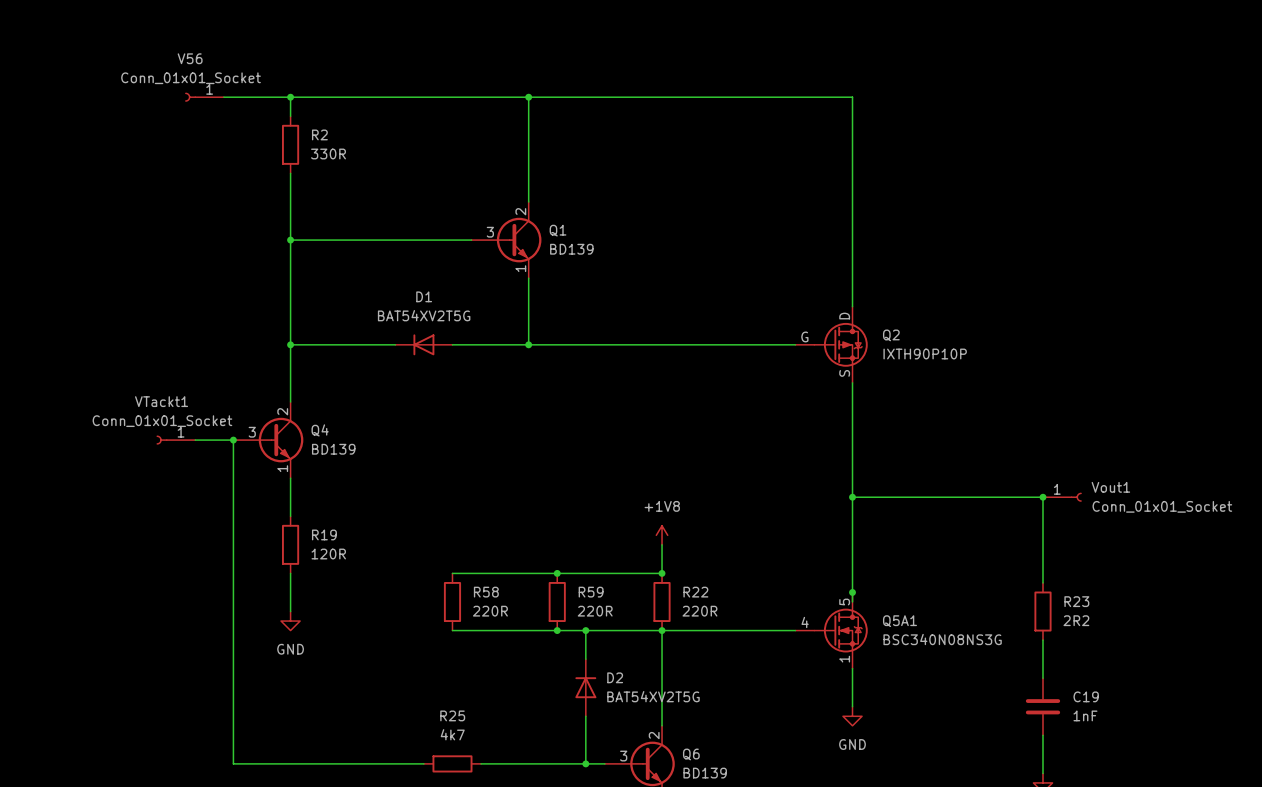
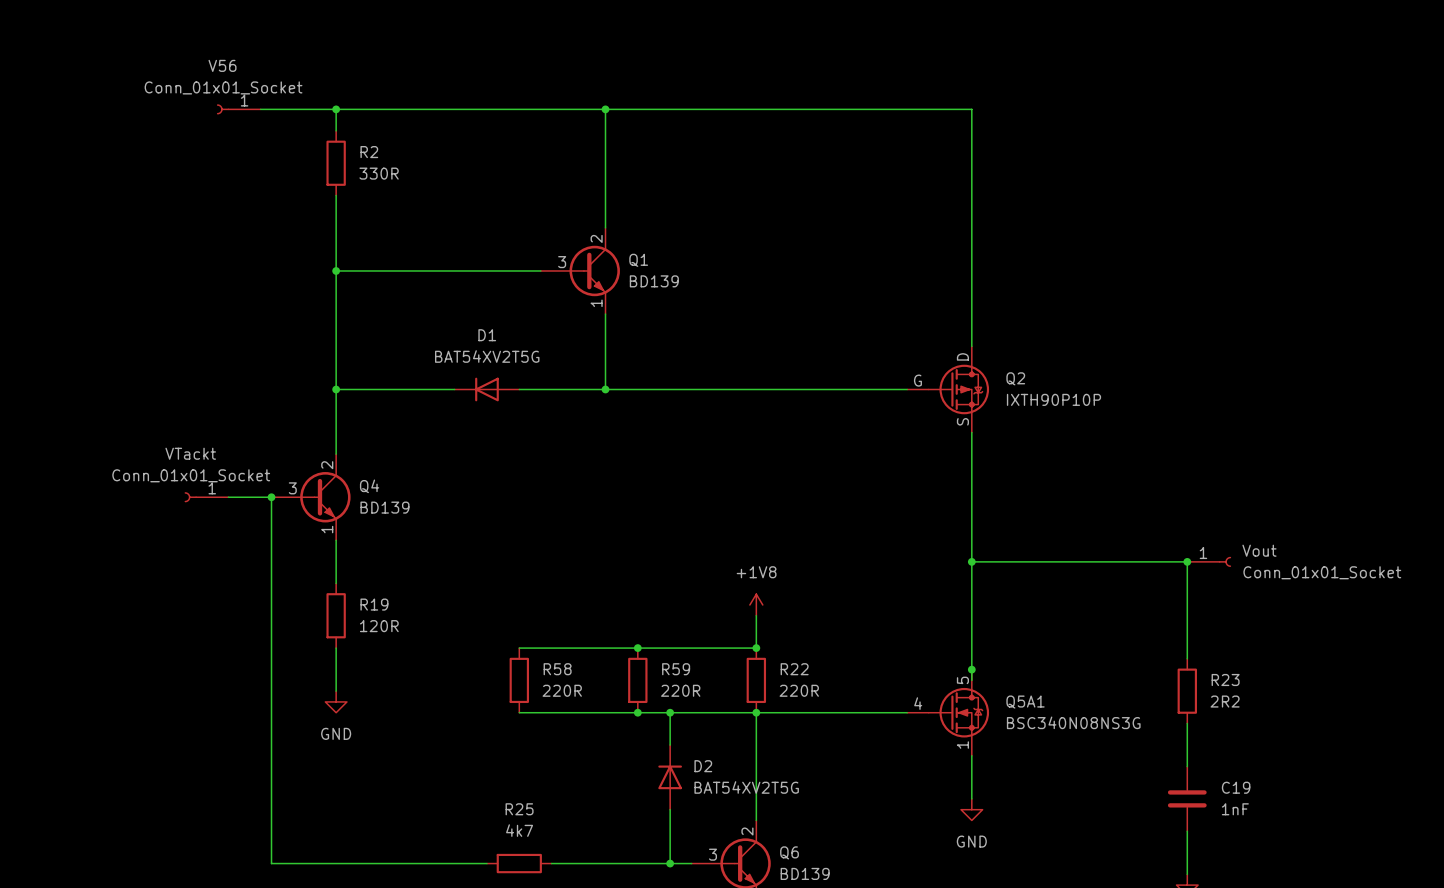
VTackt1 name: VTackt1 (161, 401) -> VTackt (190, 453)
Vout1 name: Vout1 (1110, 487) -> Vout (1259, 550)

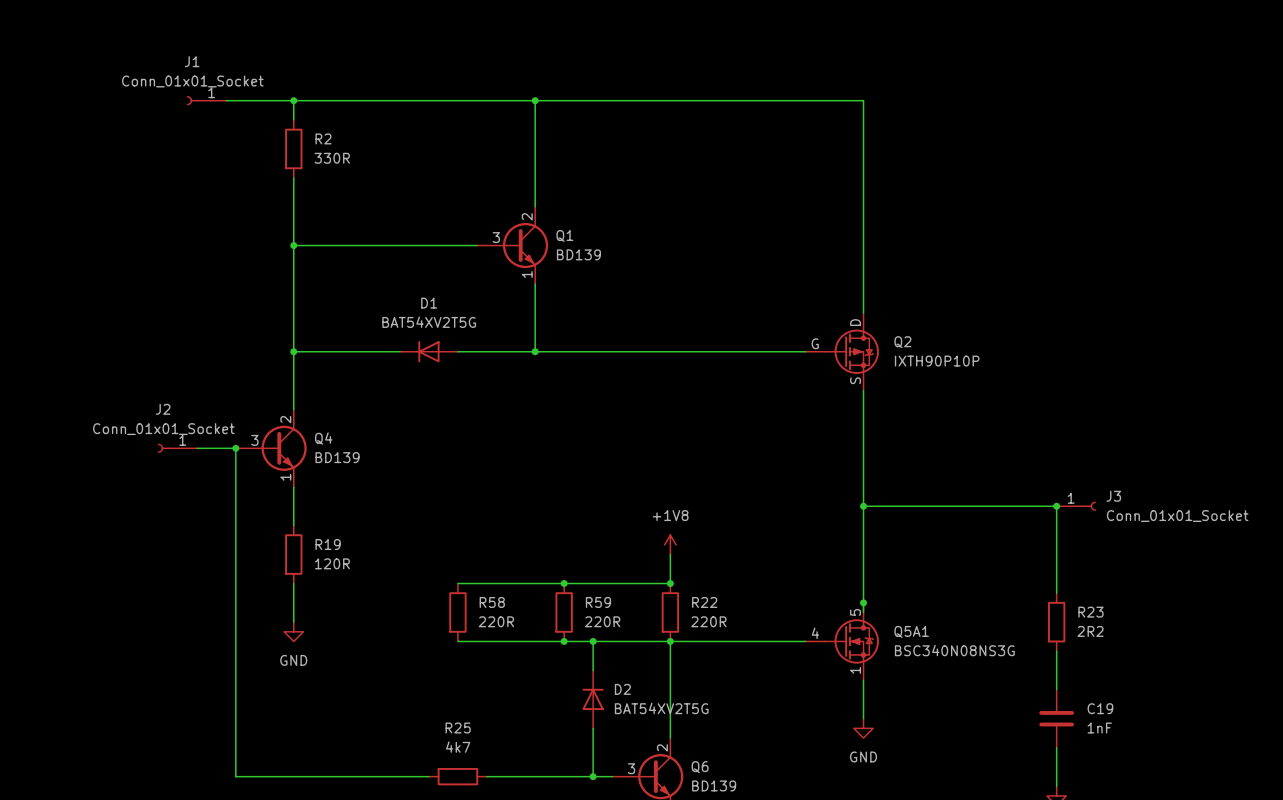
V56 name: V56 (222, 65) -> J1 (192, 61)
VTackt name: VTackt (190, 453) -> J2 (163, 409)
Vout name: Vout (1259, 550) -> J3 (1113, 496)

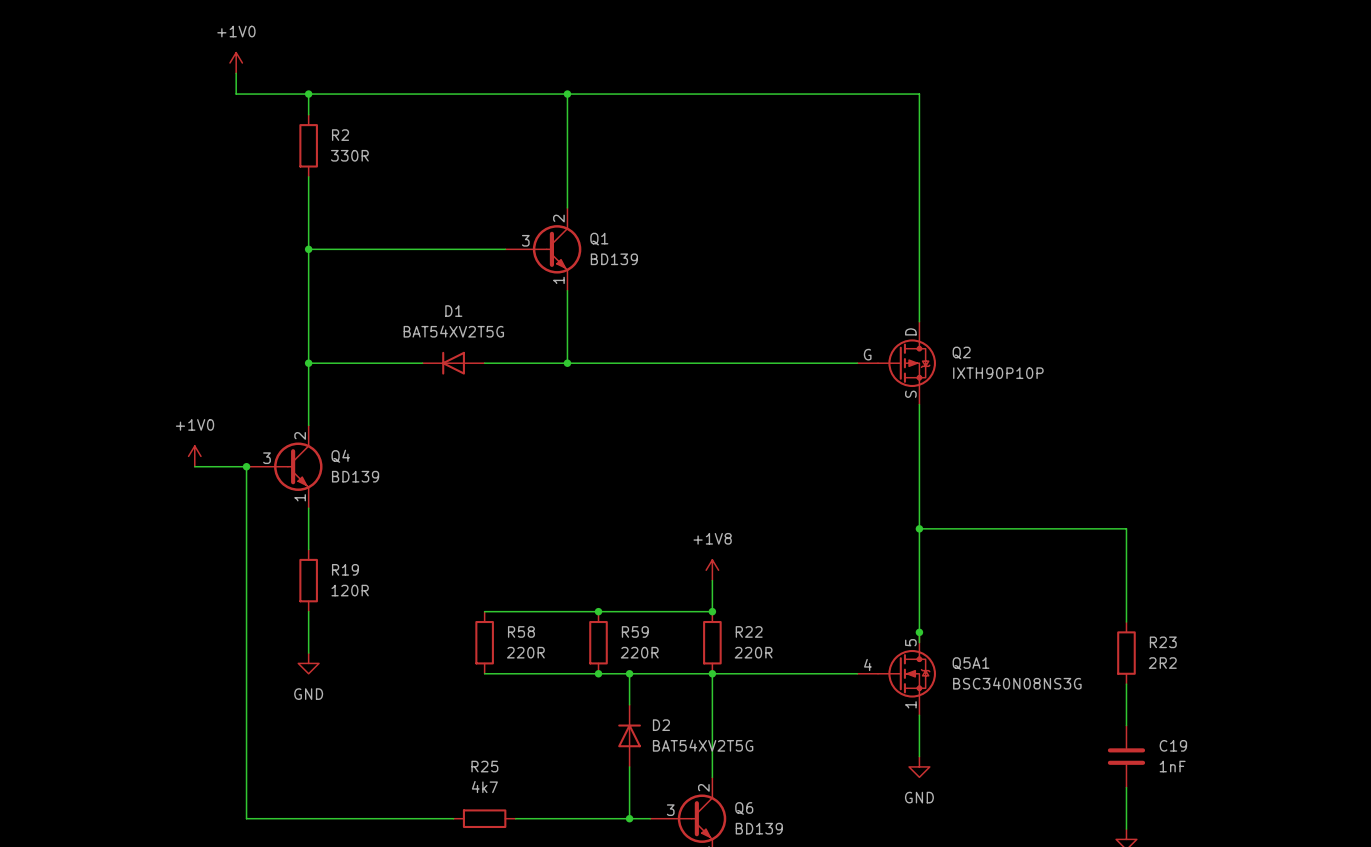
power symbol: none -> +1V0 (236, 62)
wire: none -> (236, 73) (236, 94)
J1: Conn_01x01_Socket (206, 100) -> none
power symbol: none -> +1V0 (194, 456)
J2: Conn_01x01_Socket (177, 448) -> none
junction: (1056, 506) -> none
J3: Conn_01x01_Socket (1076, 506) -> none

